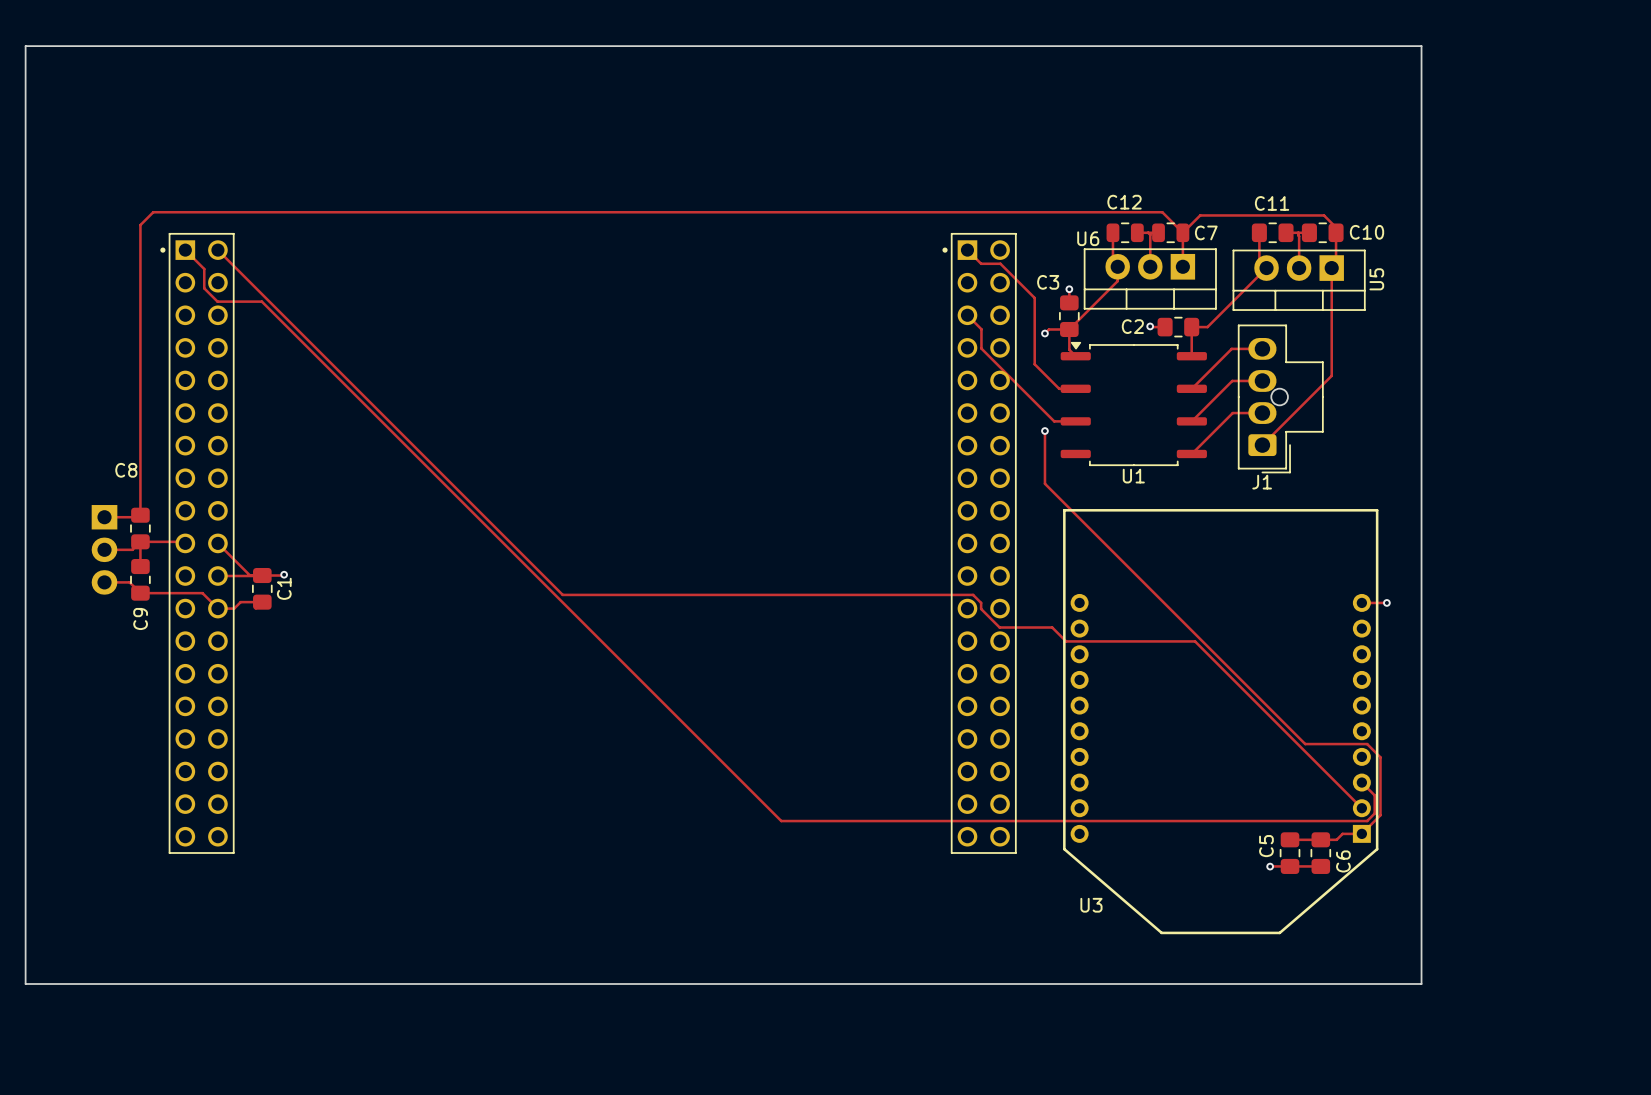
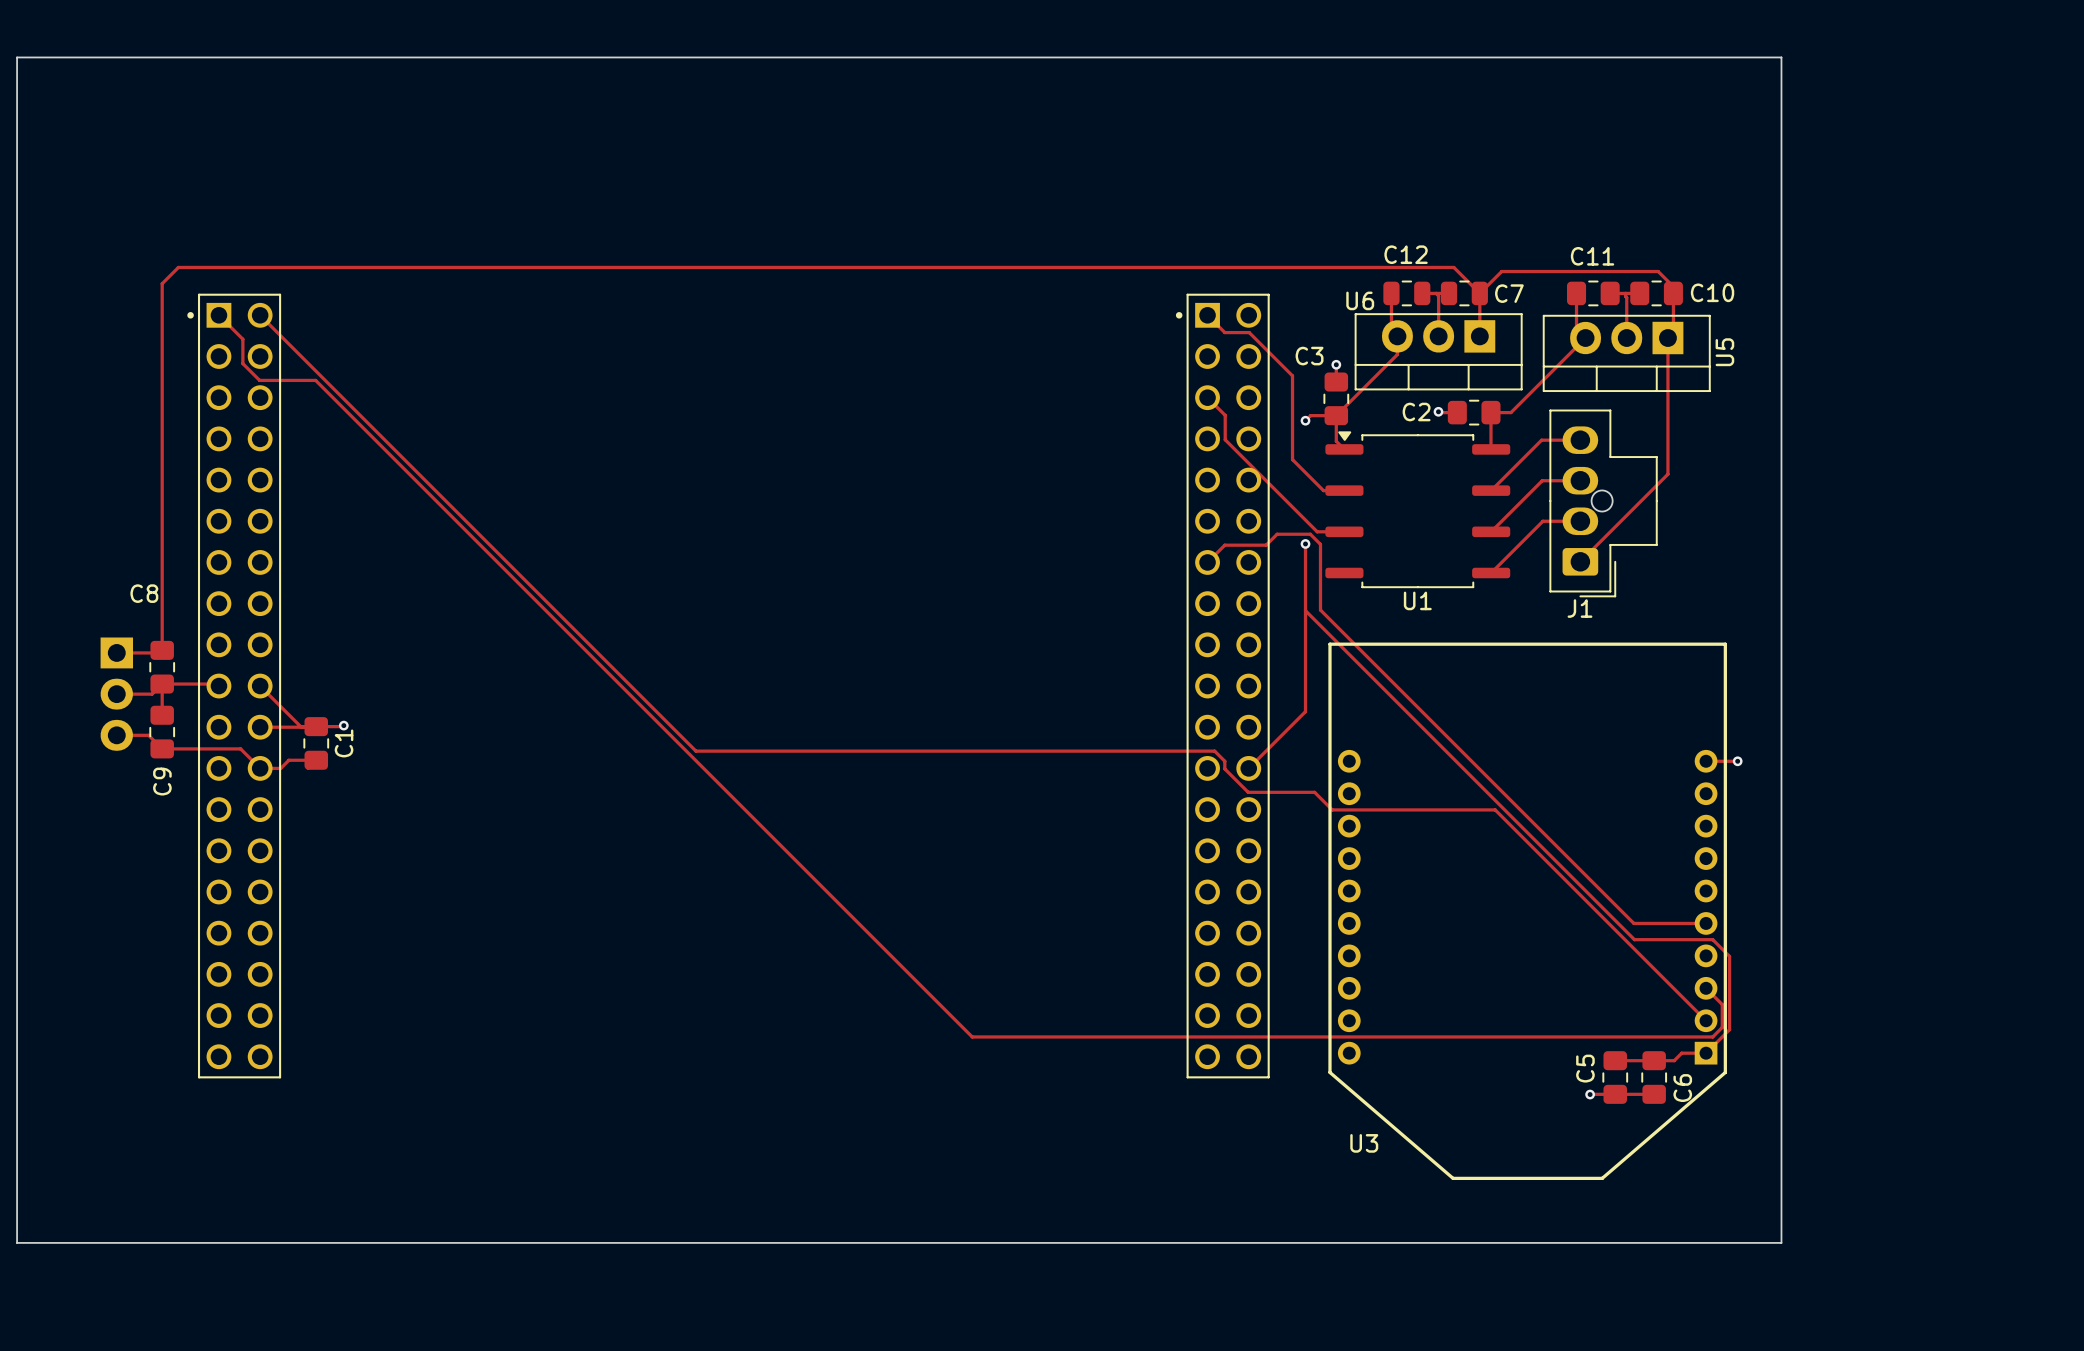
track: none -> (1207, 562) (1224, 545) (1266, 545) (1277, 534) (1310, 534) (1320, 544) (1320, 610) (1633, 923) (1706, 923)
track: none -> (1305, 610) (1305, 711) (1248, 768)

